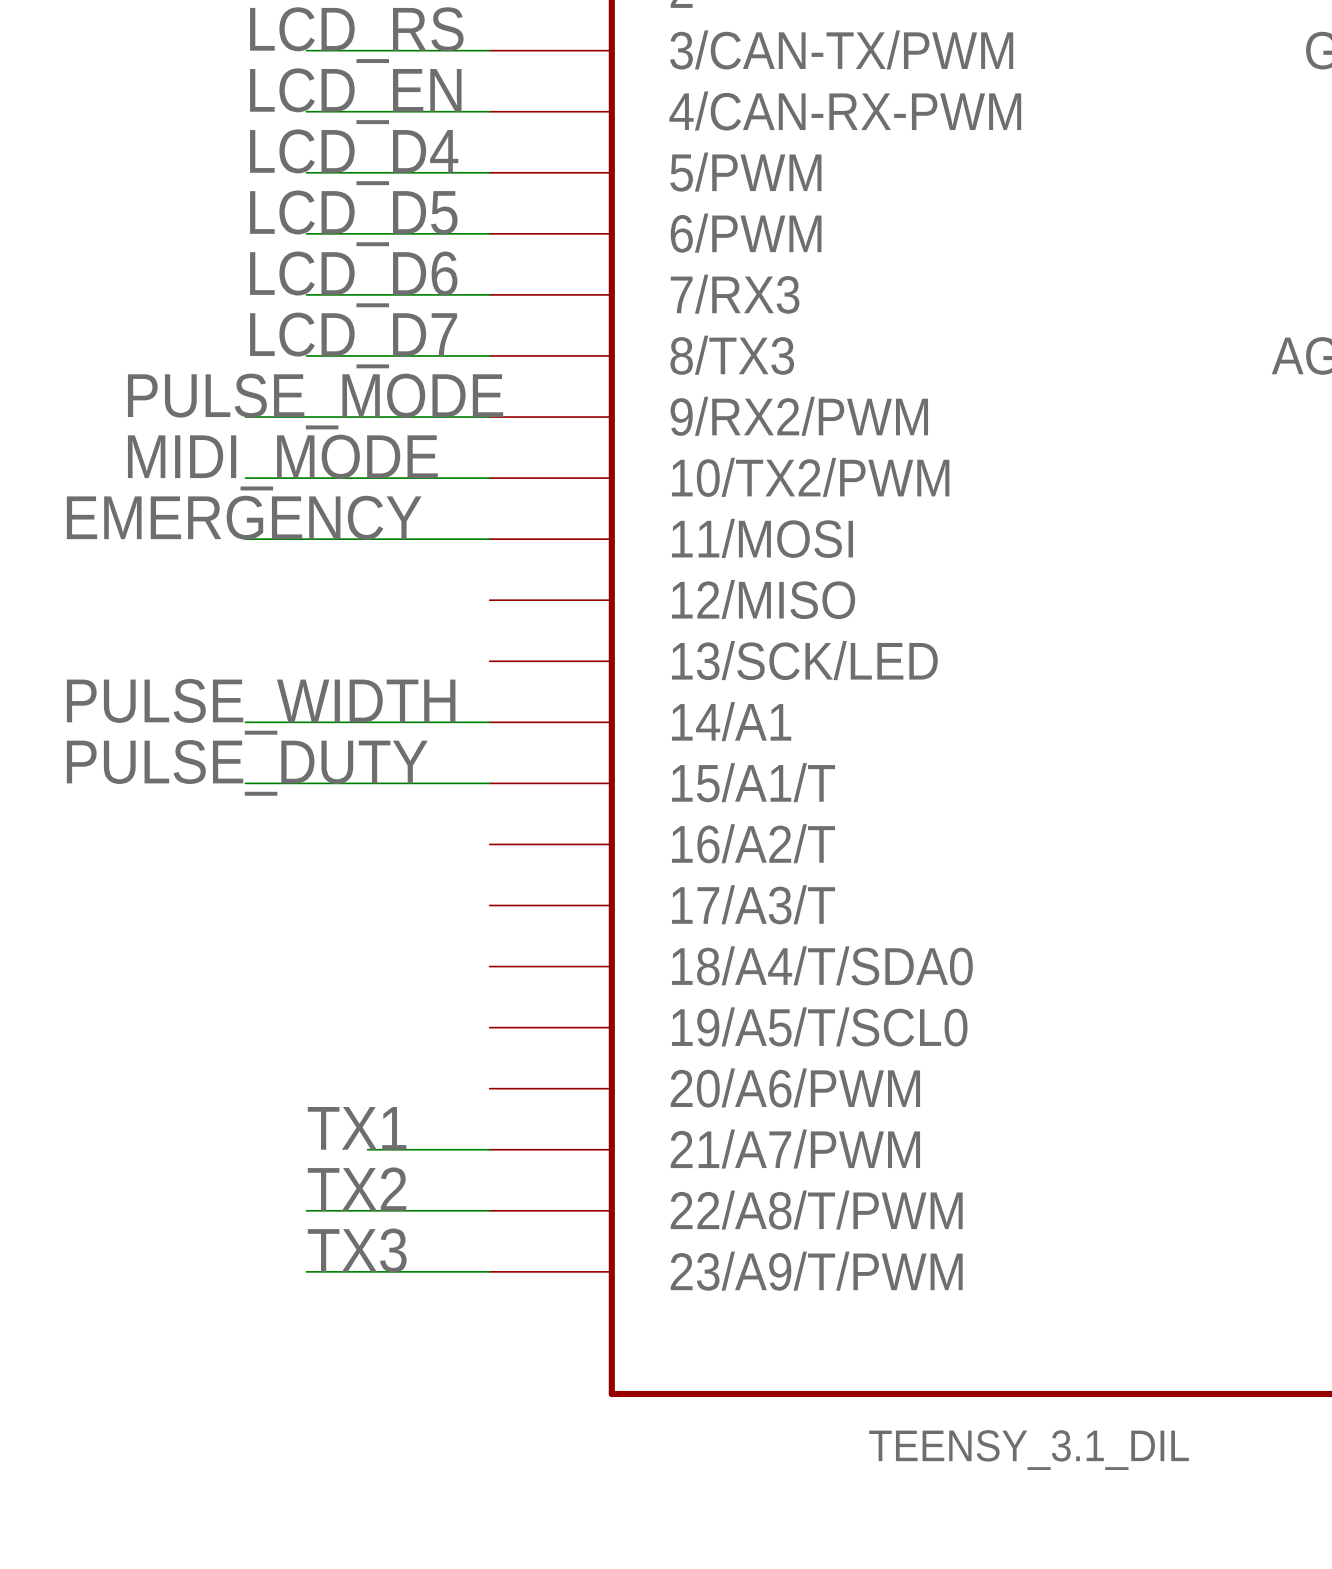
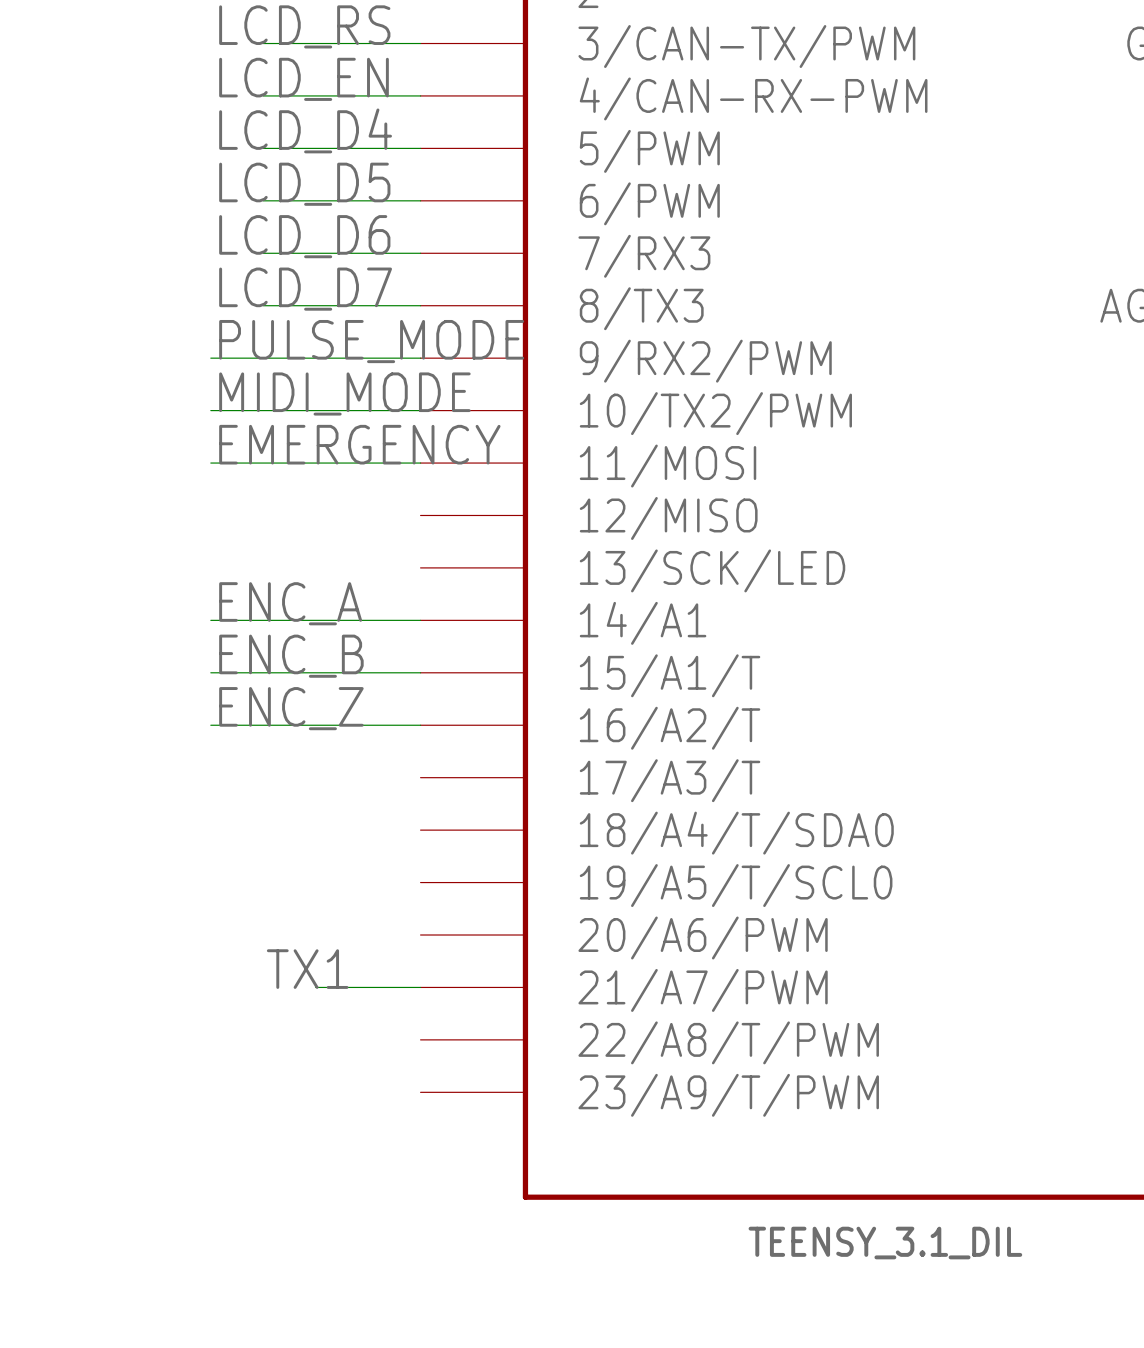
label position: PULSE_MODE (315, 401) -> PULSE_MODE (371, 341)
label position: MIDI_MODE (282, 462) -> MIDI_MODE (344, 393)
label position: EMERGENCY (244, 517) -> EMERGENCY (359, 444)
label: PULSE_WIDTH (261, 706) -> none
label: none -> ENC_A (290, 603)
label: PULSE_DUTY (247, 767) -> none
label: none -> ENC_B (291, 656)
label: none -> ENC_Z (291, 708)
wire: none -> (210, 725) (420, 725)
label: TX2 (357, 1189) -> none
wire: (306, 1210) (489, 1210) -> none
label: TX3 (357, 1250) -> none
wire: (306, 1271) (489, 1271) -> none

